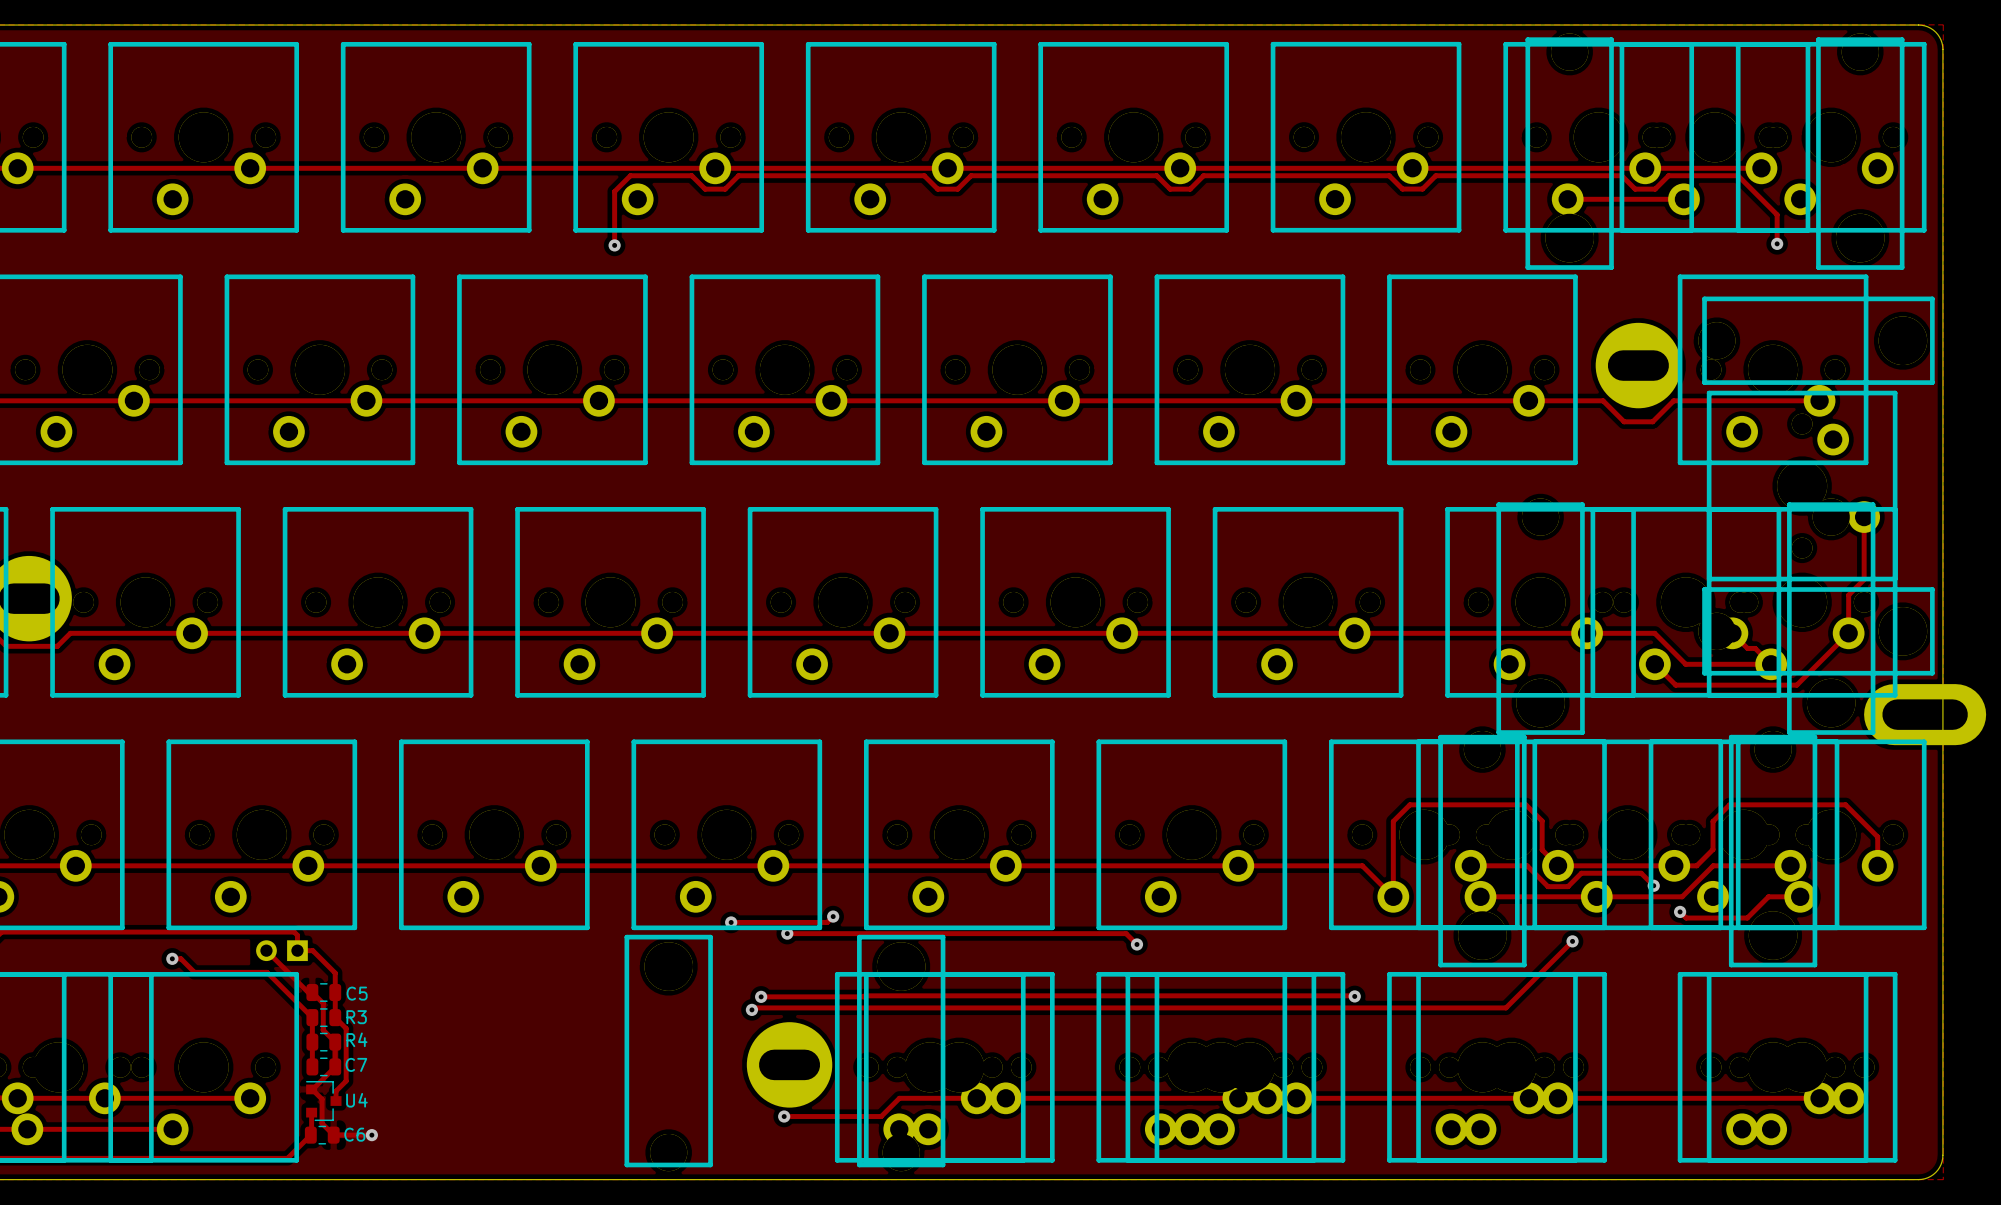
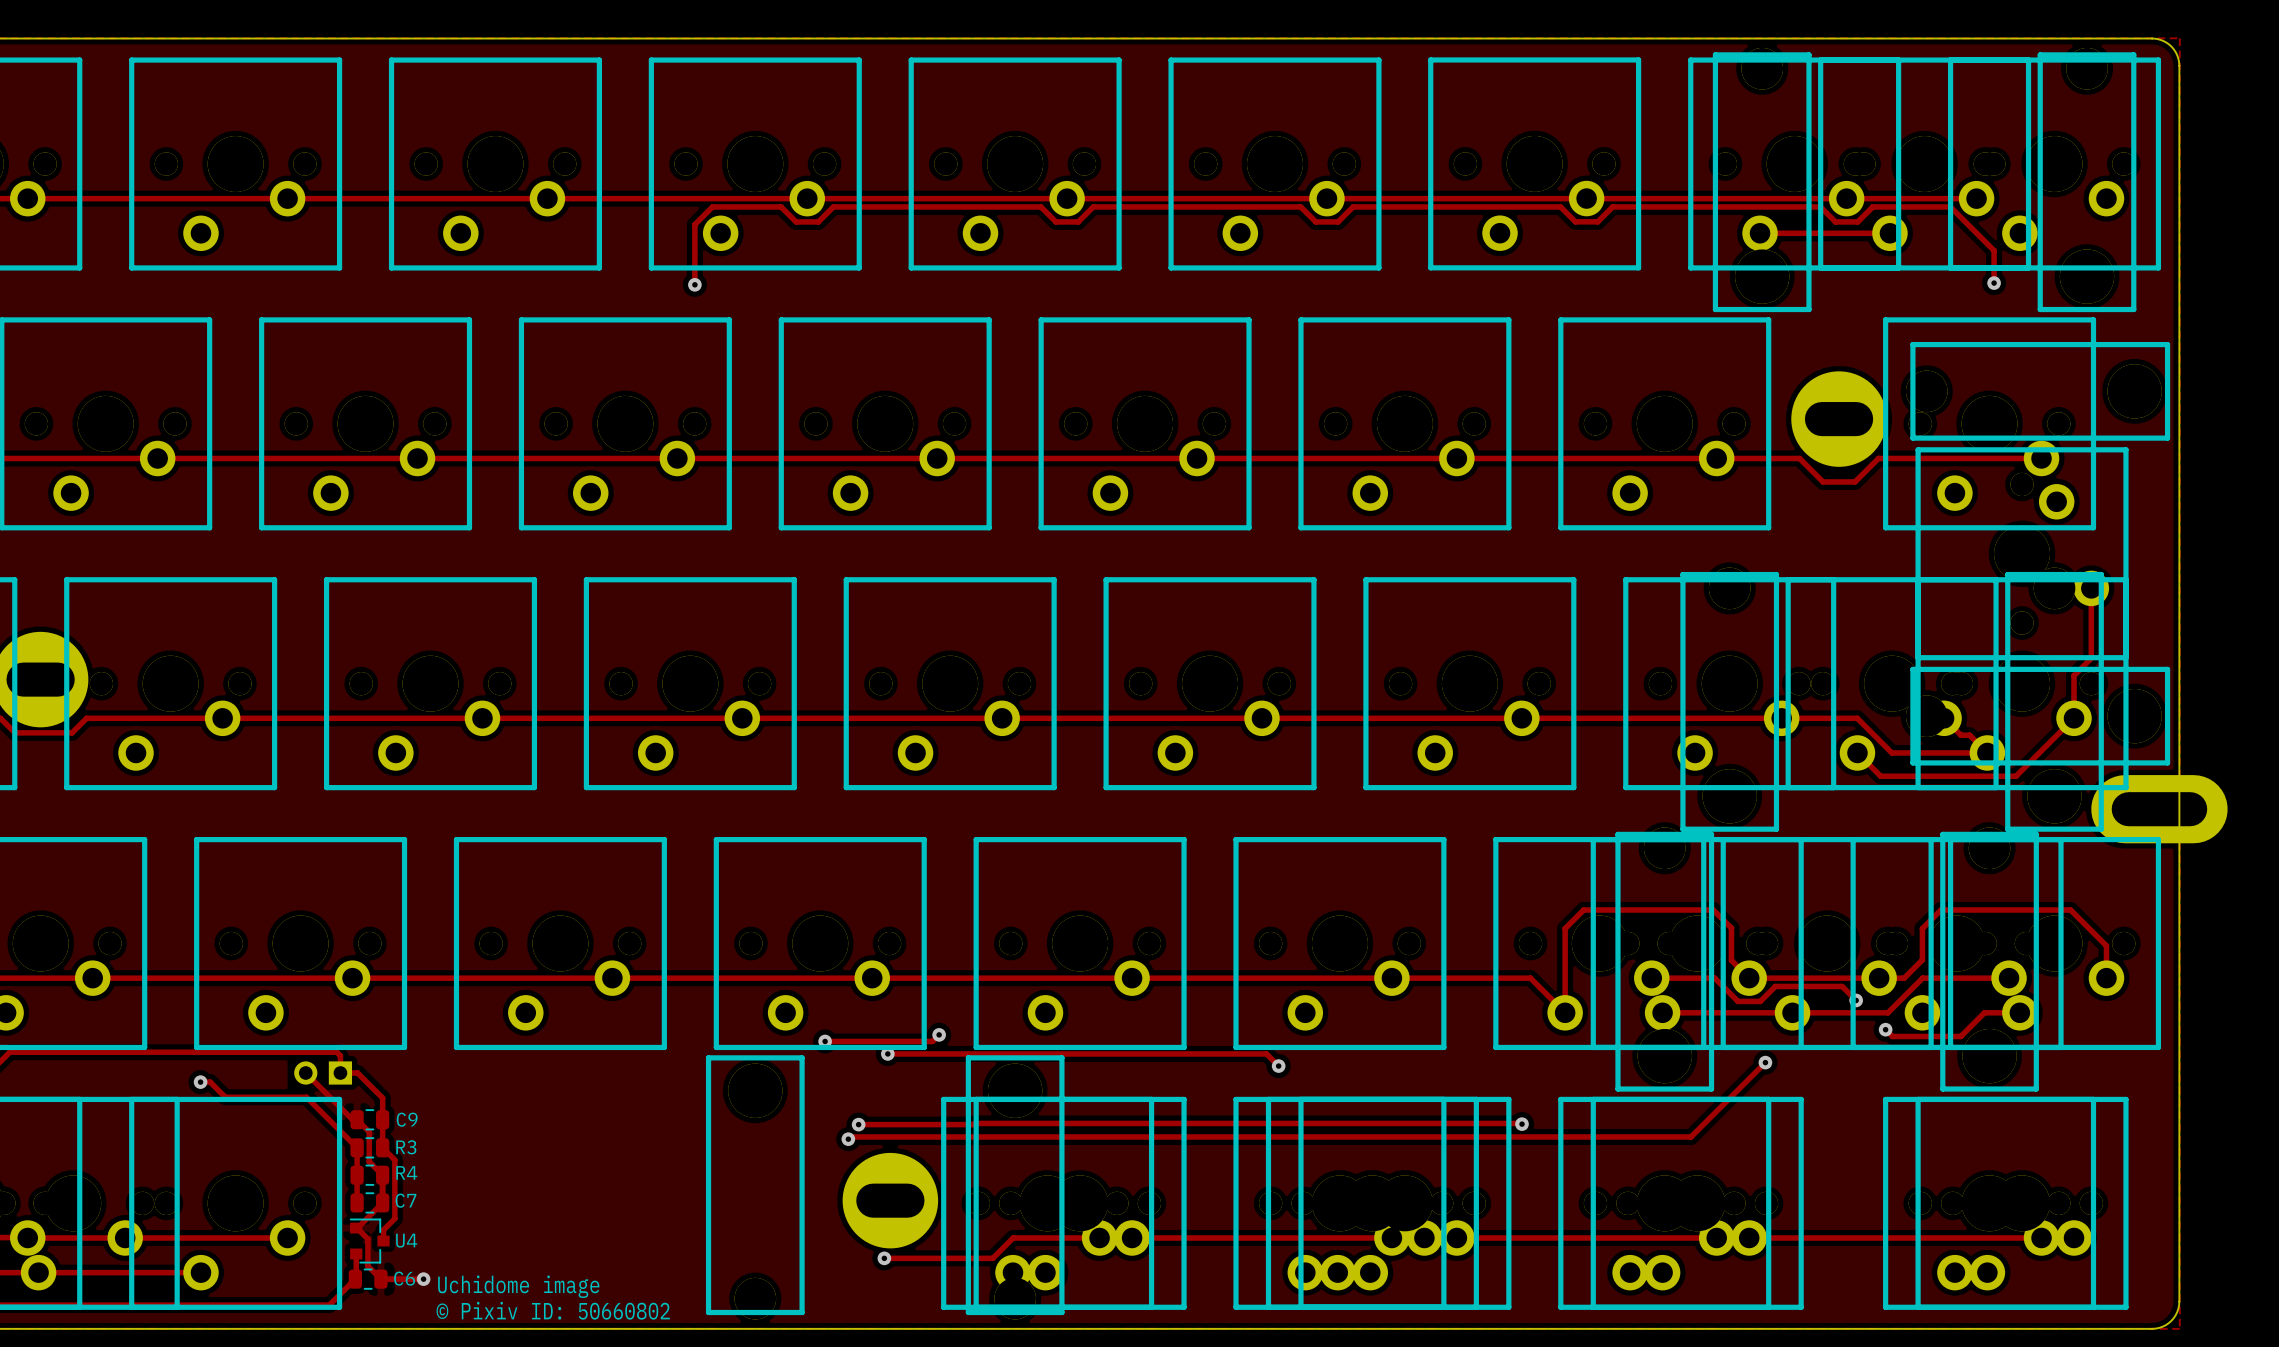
C5 name: C5 (357, 993) -> C9 (407, 1119)
text: none -> Uchidome image (518, 1286)
text: none -> © Pixiv ID: 50660802 (553, 1310)

